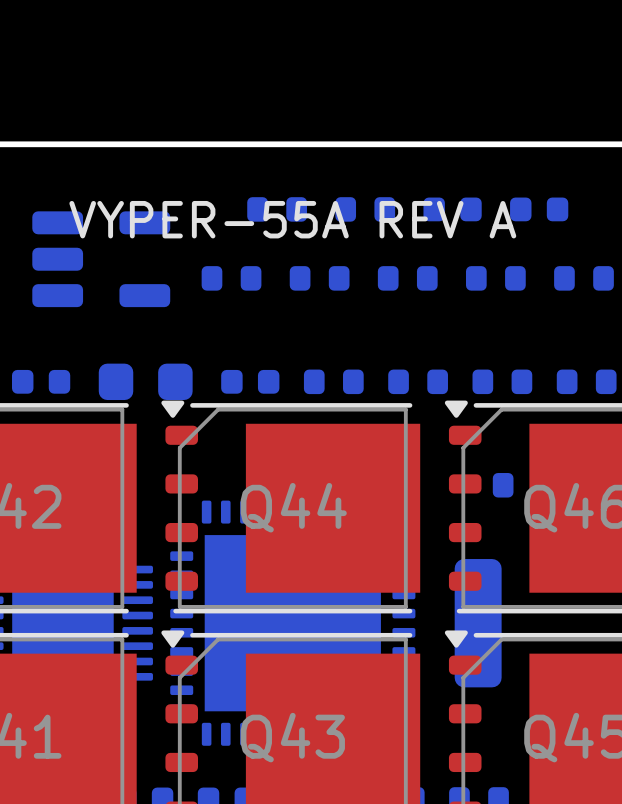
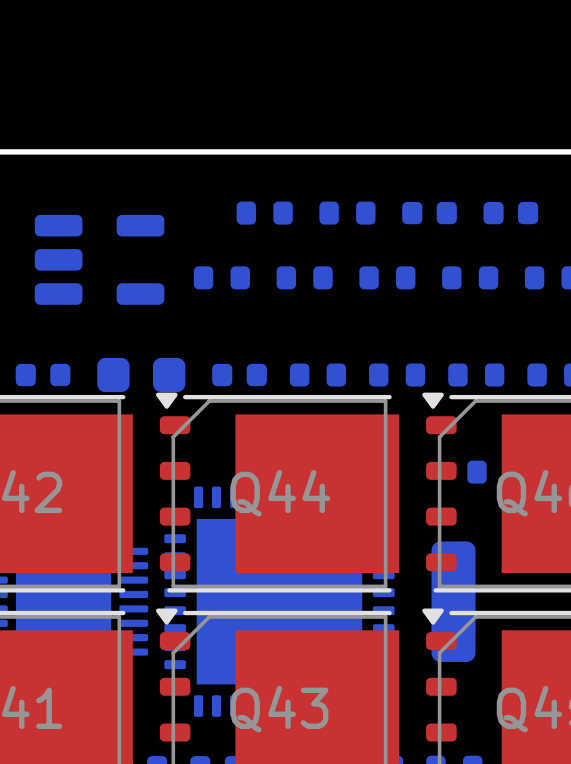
text: VYPER-55A REV A (292, 219) -> none

